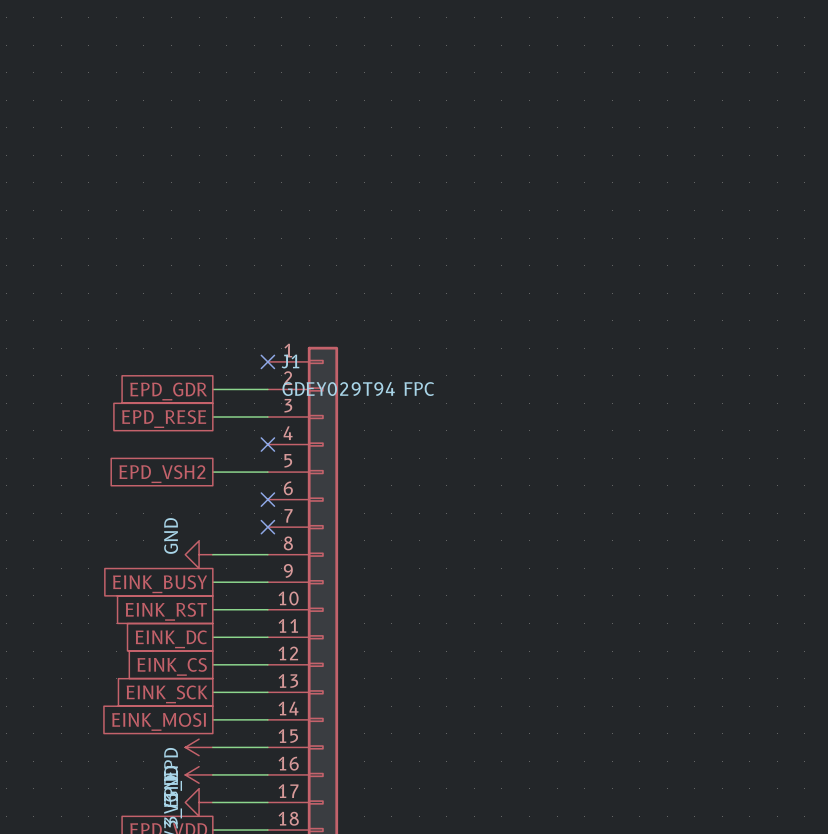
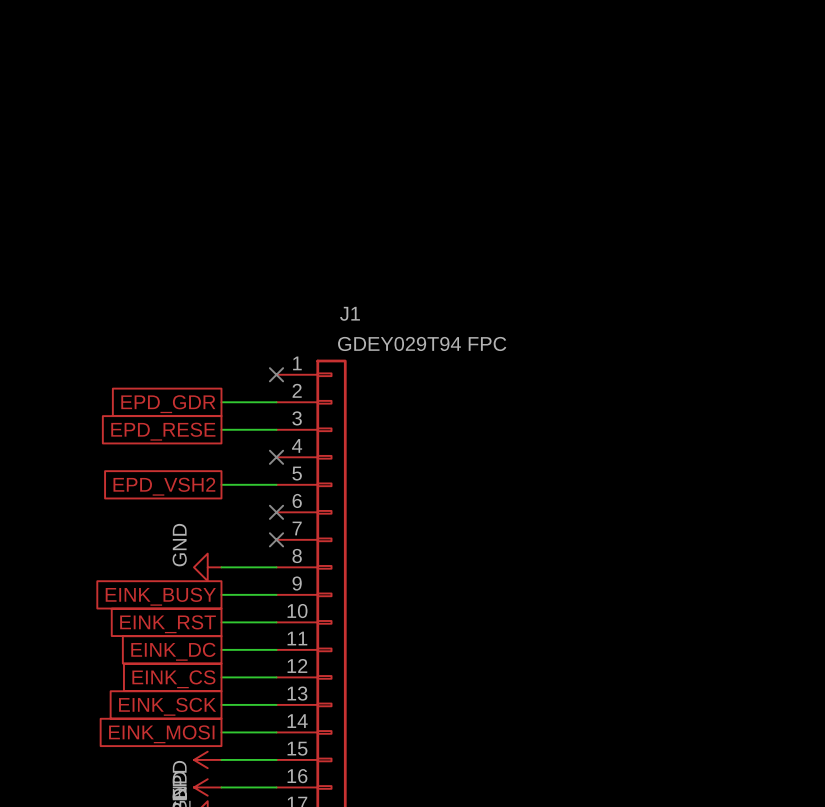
J1 name position: J1 (290, 361) -> J1 (350, 313)
J1 value position: GDEY029T94 FPC (358, 389) -> GDEY029T94 FPC (422, 343)

